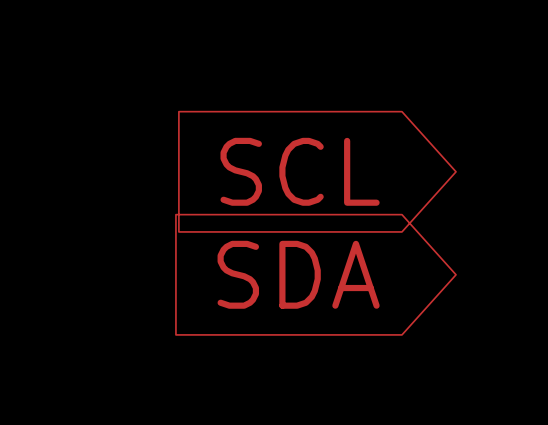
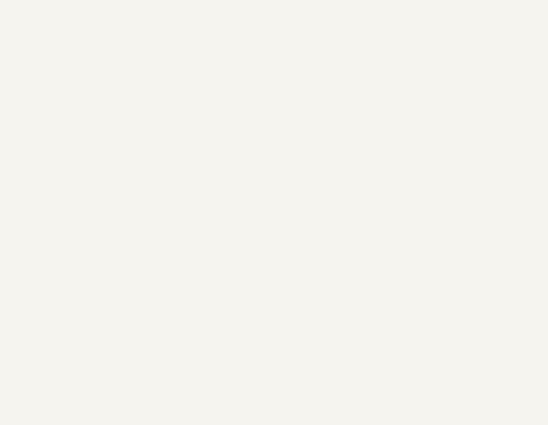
global label: SCL (300, 171) -> none
global label: SDA (298, 274) -> none

